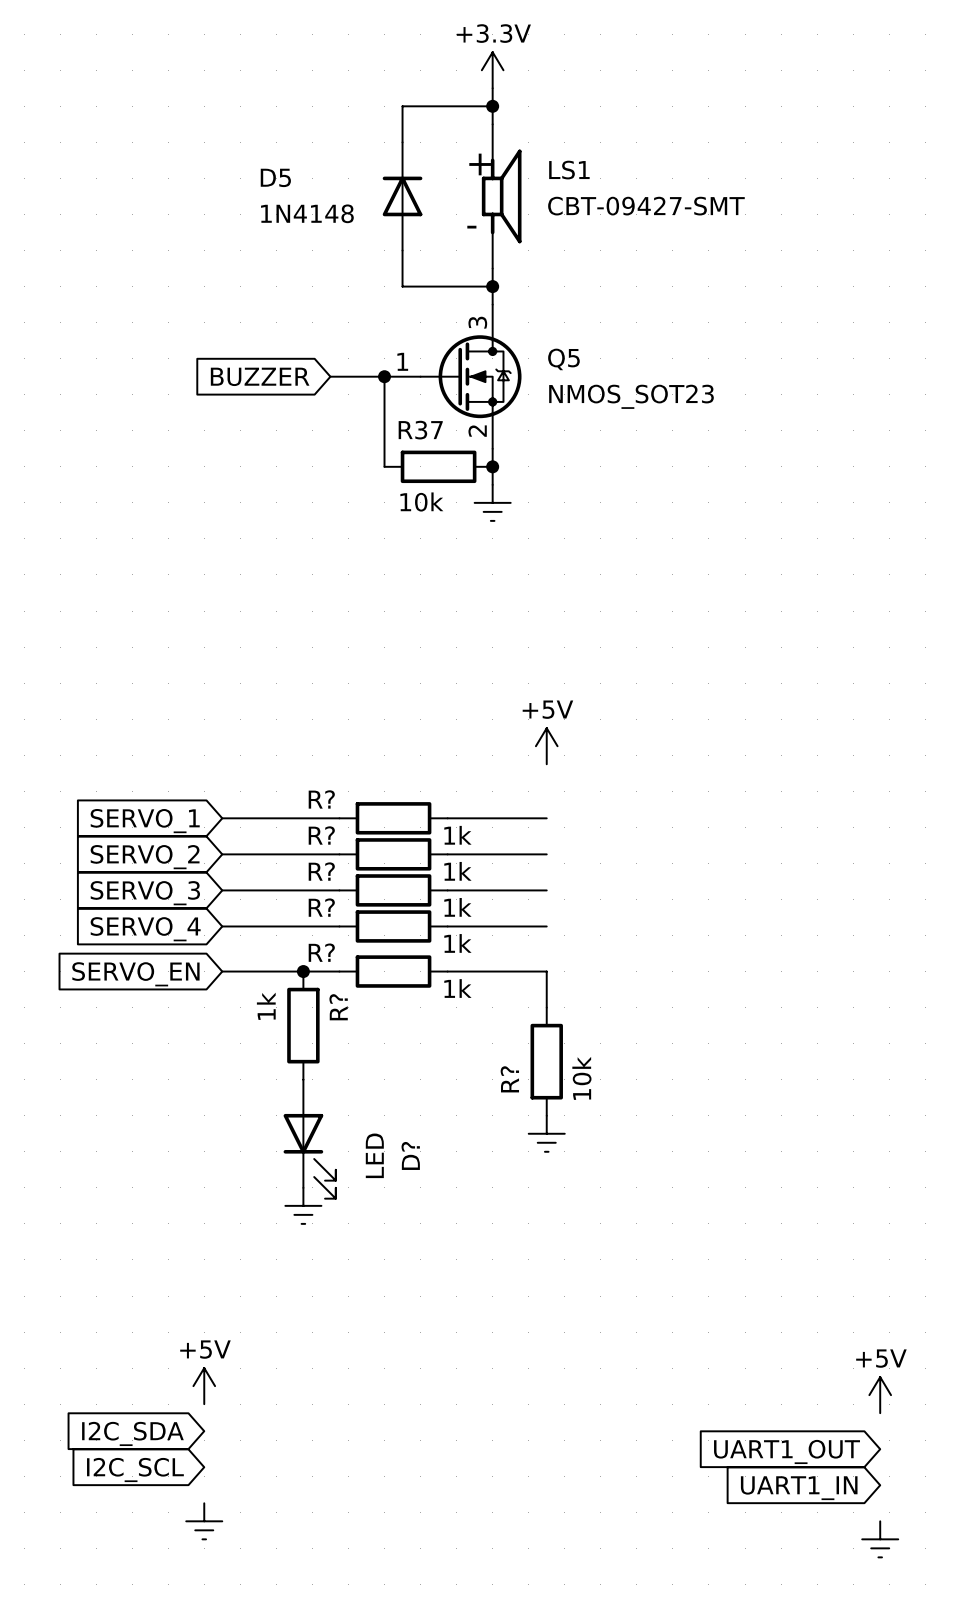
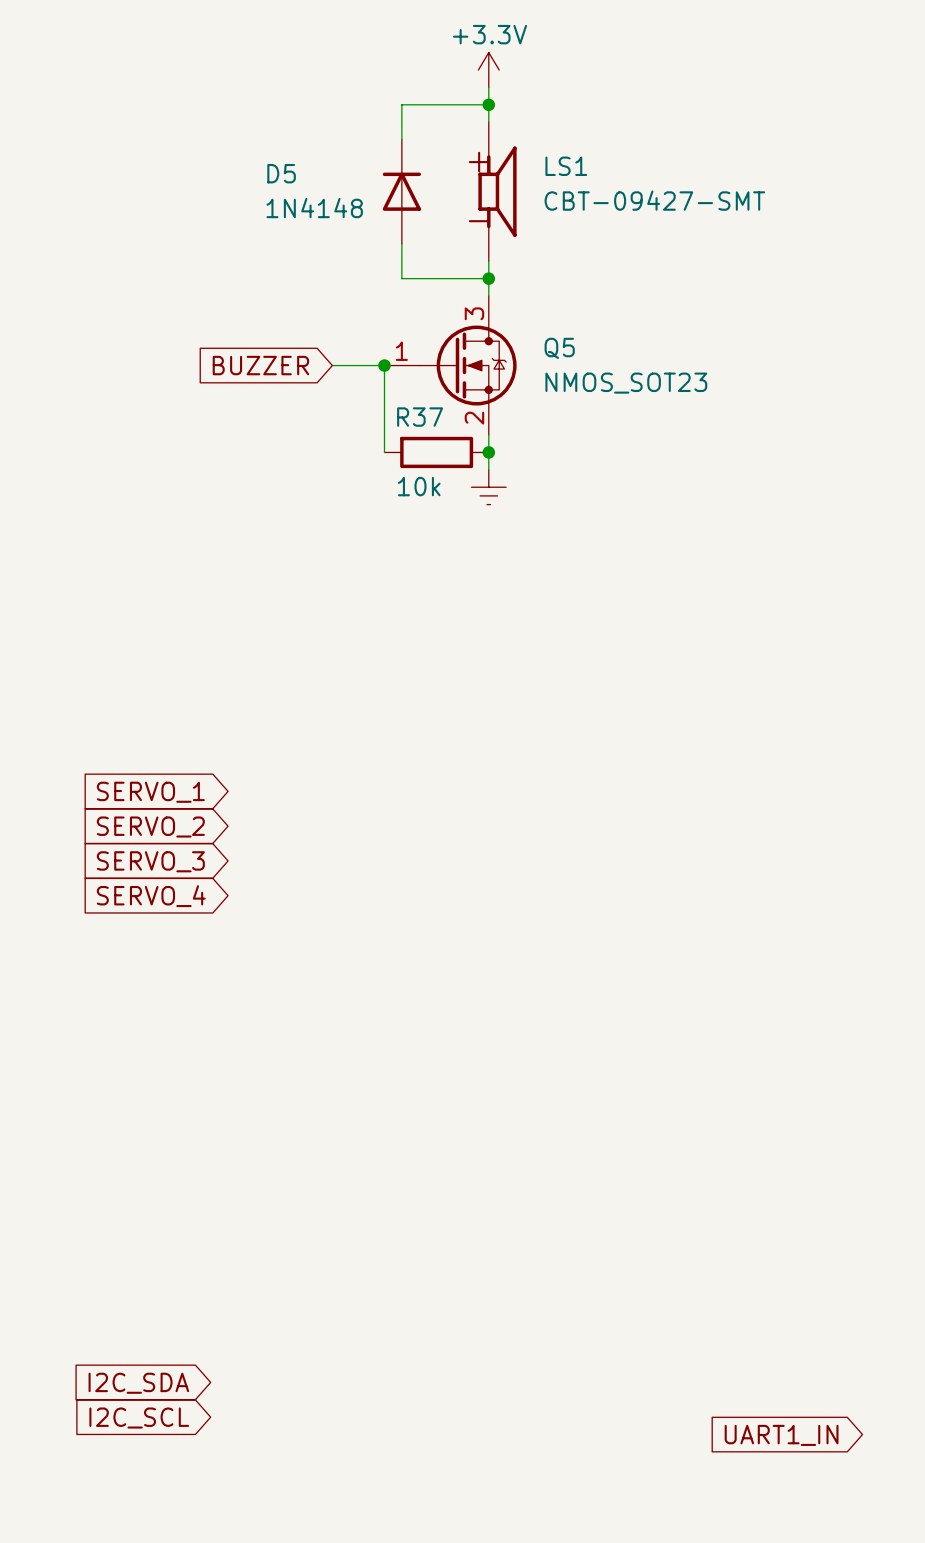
power symbol: +5V (546, 746) -> none
wire: (222, 818) (339, 818) -> none
R?: 1k (393, 818) -> none
wire: (447, 818) (546, 818) -> none
wire: (222, 854) (339, 854) -> none
R?: 1k (393, 854) -> none
wire: (447, 854) (546, 854) -> none
wire: (222, 890) (339, 890) -> none
R?: 1k (393, 890) -> none
wire: (447, 890) (546, 890) -> none
wire: (222, 926) (339, 926) -> none
R?: 1k (393, 926) -> none
wire: (447, 926) (546, 926) -> none
wire: (222, 971) (339, 971) -> none
junction: (303, 971) -> none
R?: 1k (393, 971) -> none
wire: (447, 971) (546, 971) (546, 1007) -> none
global label: SERVO_EN (135, 974) -> none
R?: 1k (303, 1025) -> none
R?: 10k (546, 1061) -> none
power symbol: (546, 1133) -> none
D?: LED (309, 1139) -> none
power symbol: (303, 1205) -> none
power symbol: +5V (204, 1386) -> none
power symbol: +5V (880, 1395) -> none
global label: UART1_OUT (787, 1451) -> none
power symbol: (204, 1521) -> none
power symbol: (880, 1539) -> none

